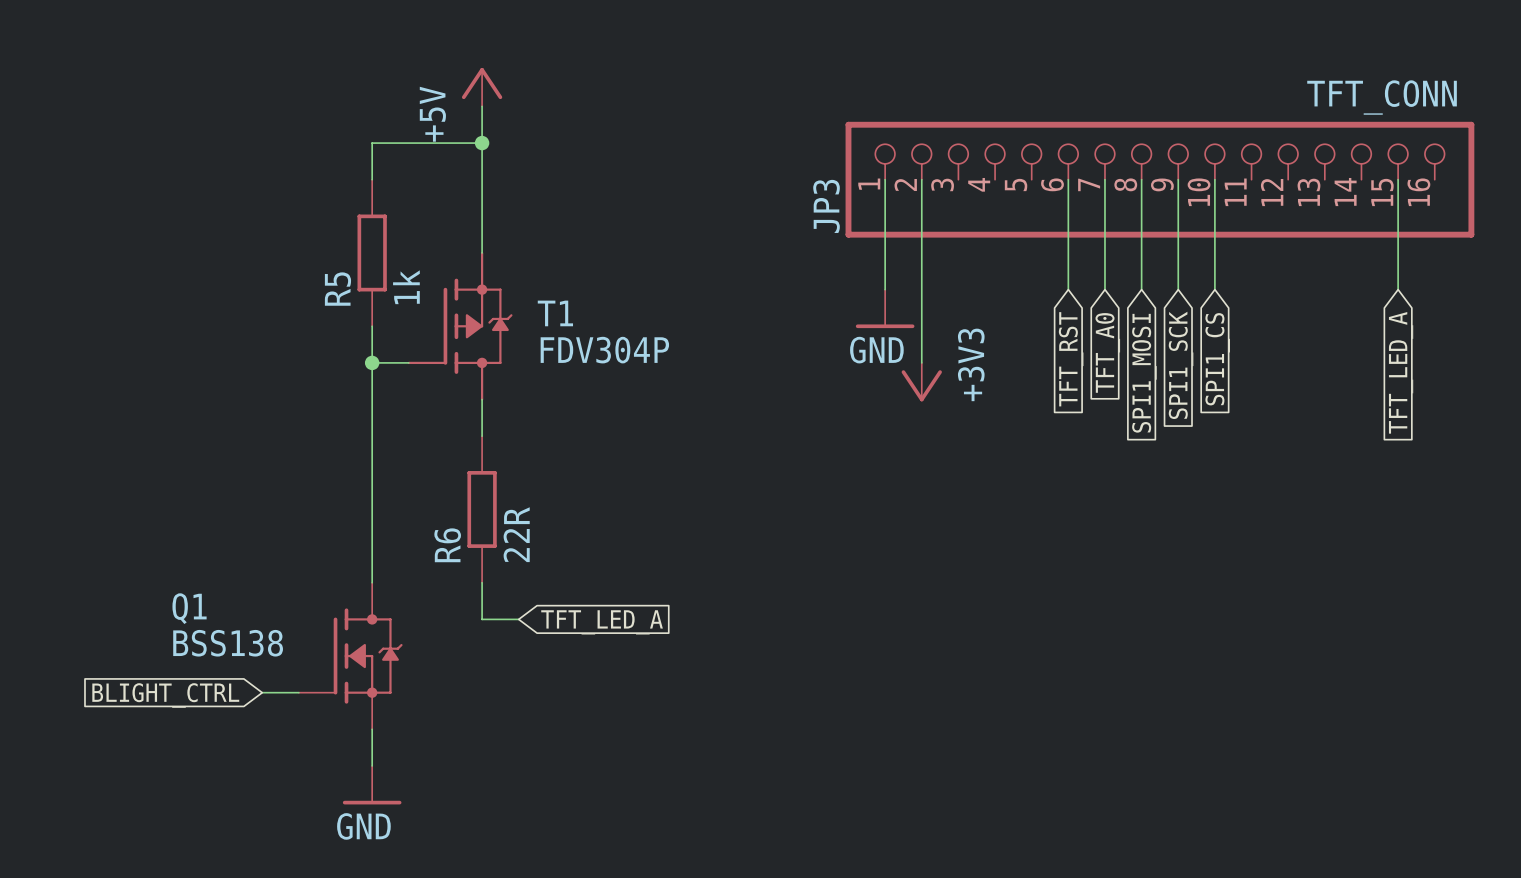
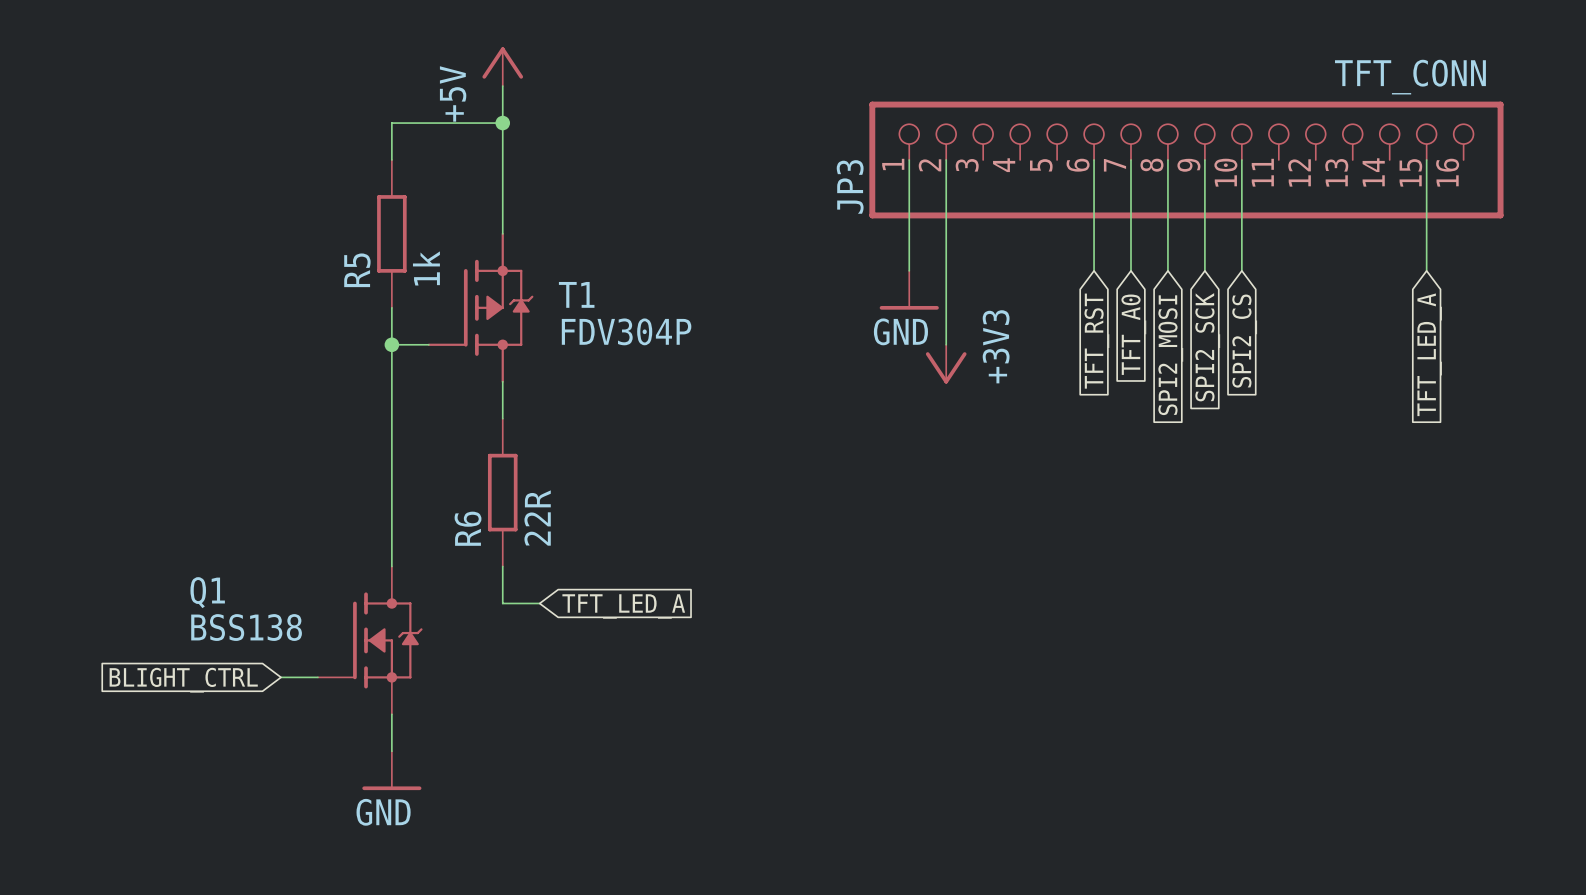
global label: SPI1_CS (1217, 359) -> SPI2_CS (1244, 341)
global label: SPI1_SCK (1181, 365) -> SPI2_SCK (1207, 347)
global label: SPI1_MOSI (1144, 373) -> SPI2_MOSI (1170, 355)

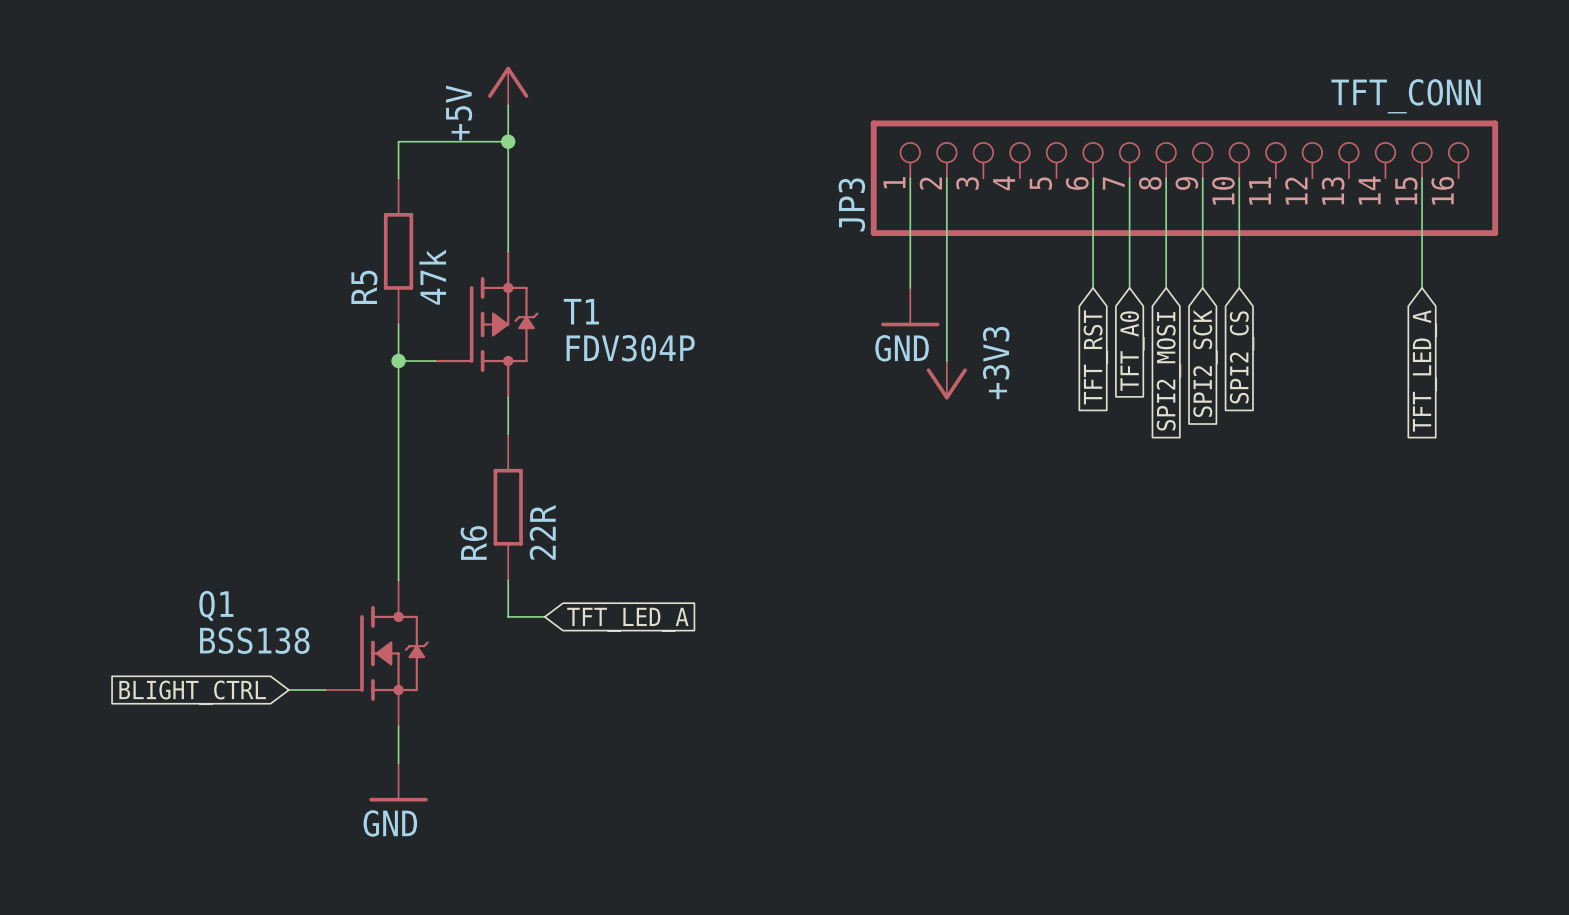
R5 value: 1k (426, 268) -> 47k (432, 277)

